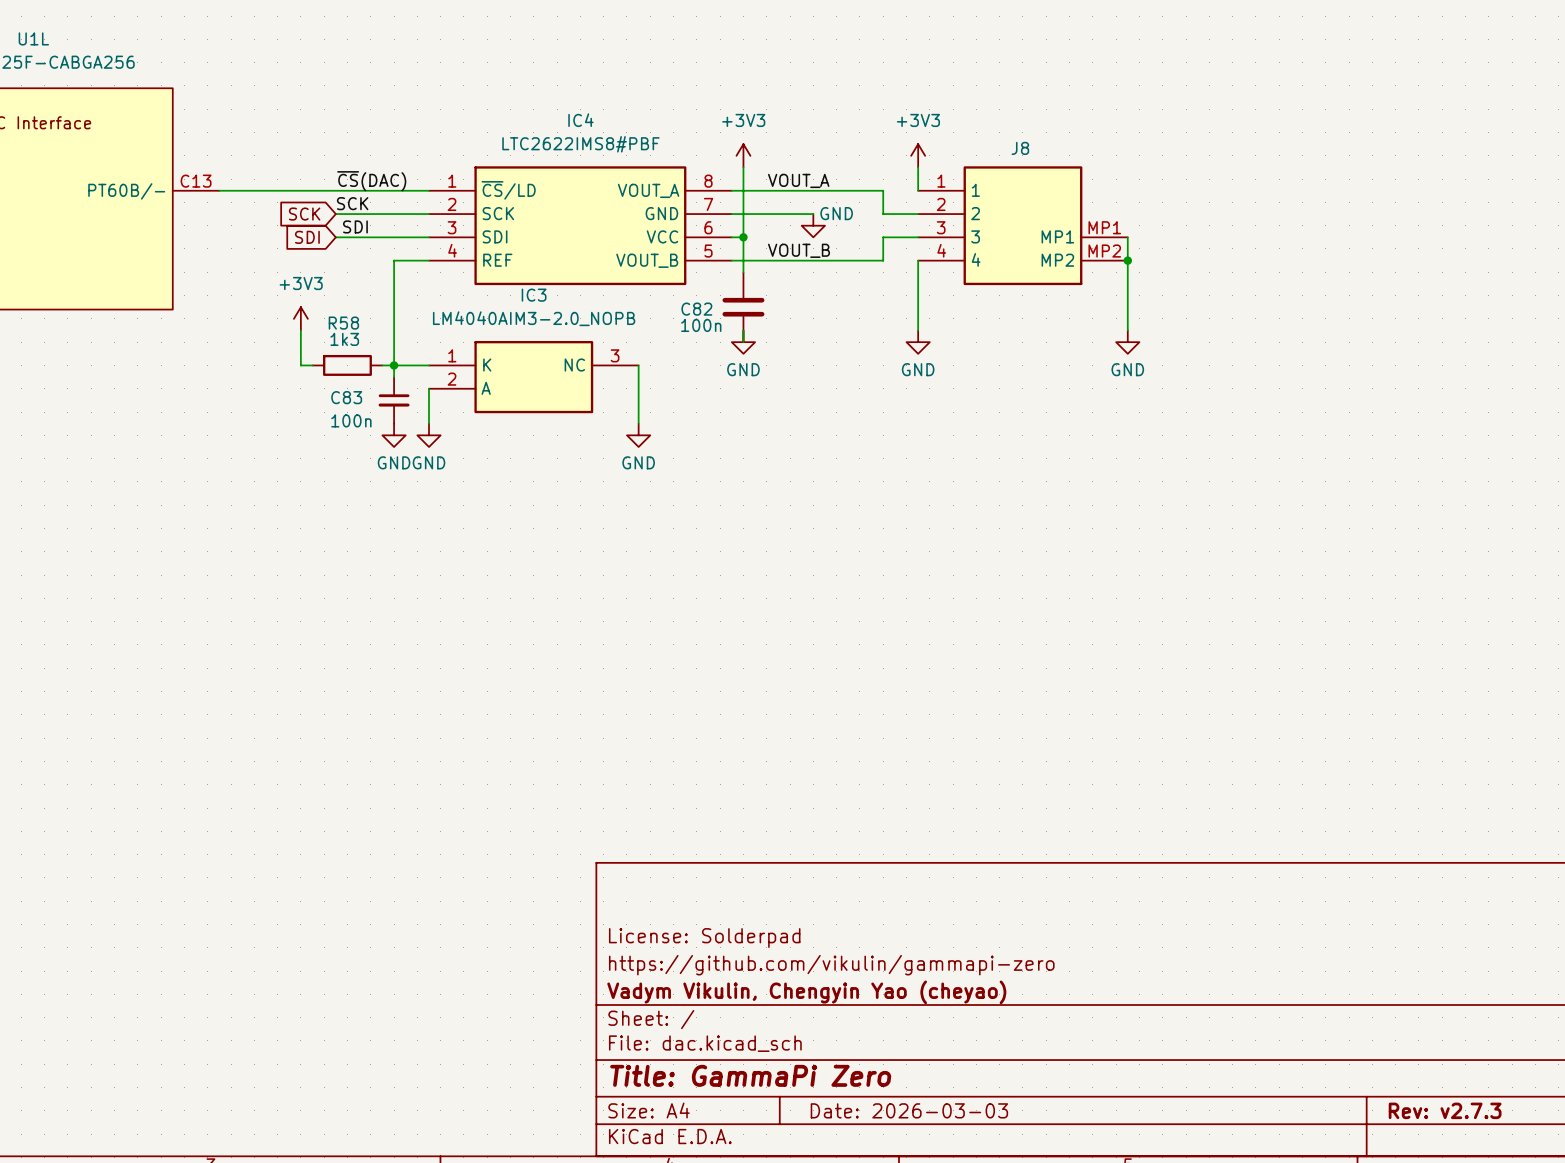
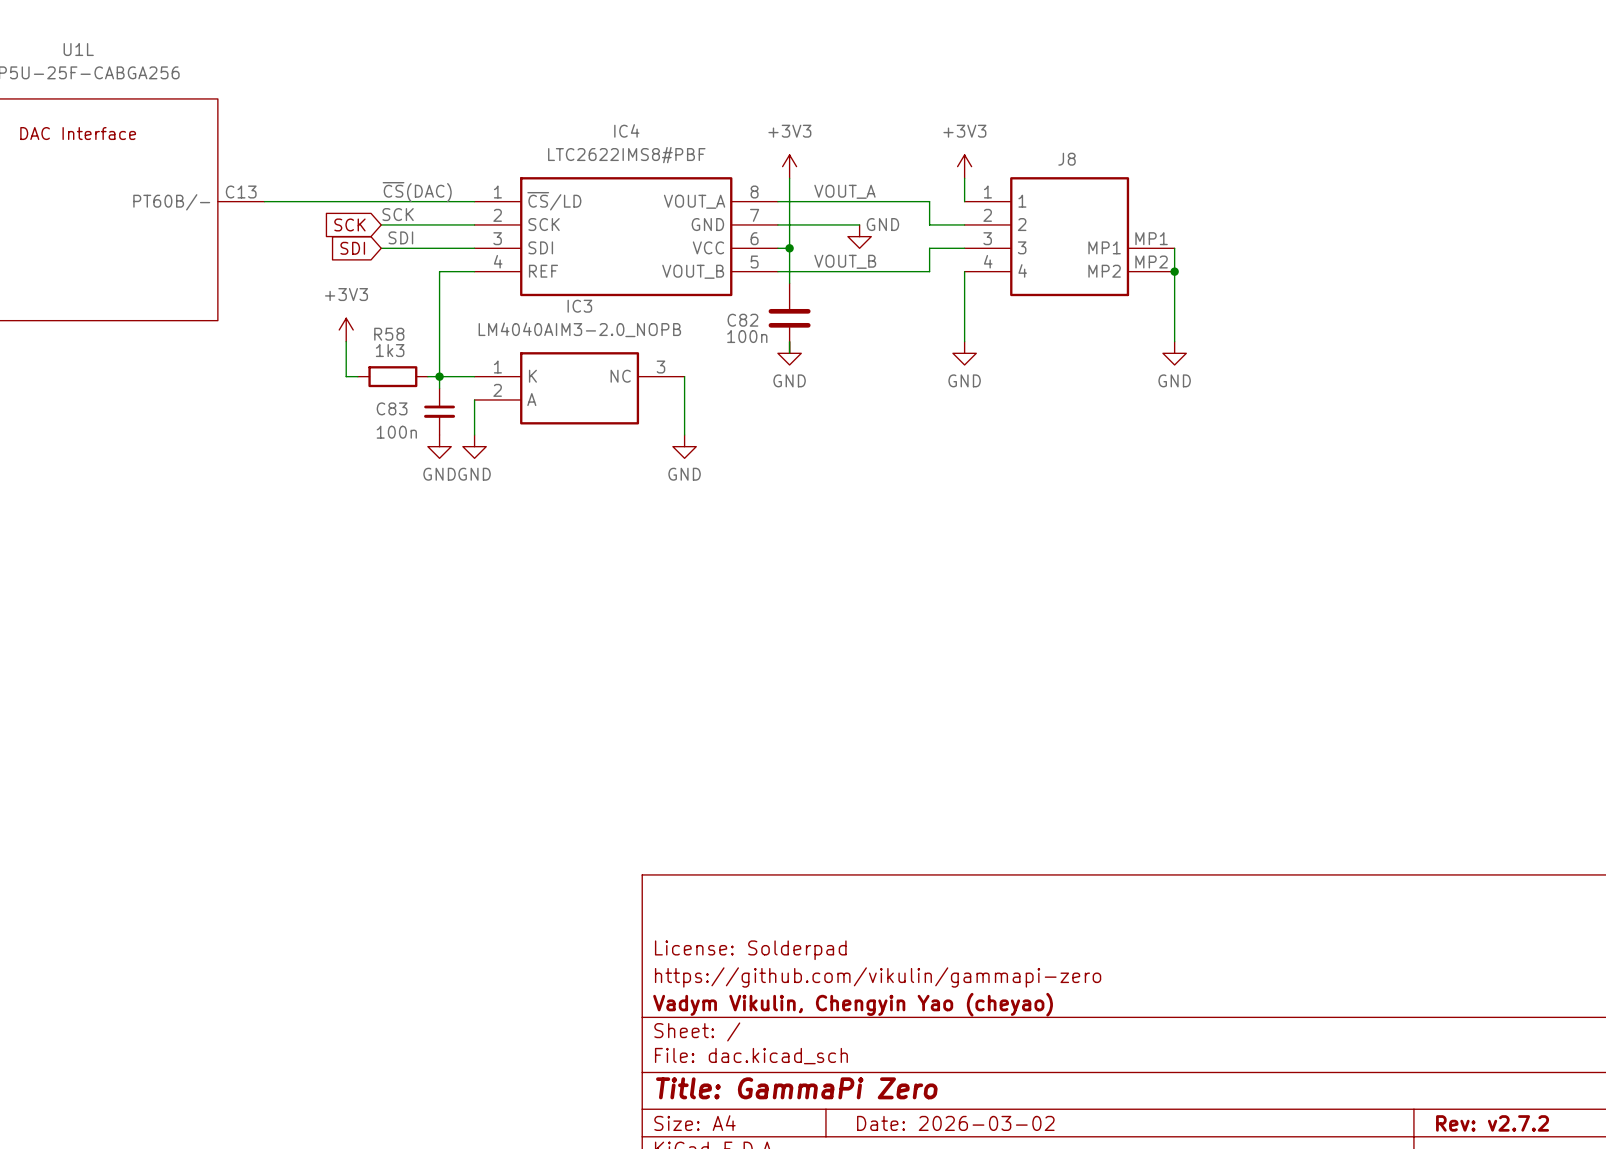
title block: Date: 2026-03-03 (909, 1110) -> Date: 2026-03-02 (955, 1123)
title block: Rev: v2.7.3 (1445, 1110) -> Rev: v2.7.2 (1492, 1123)

